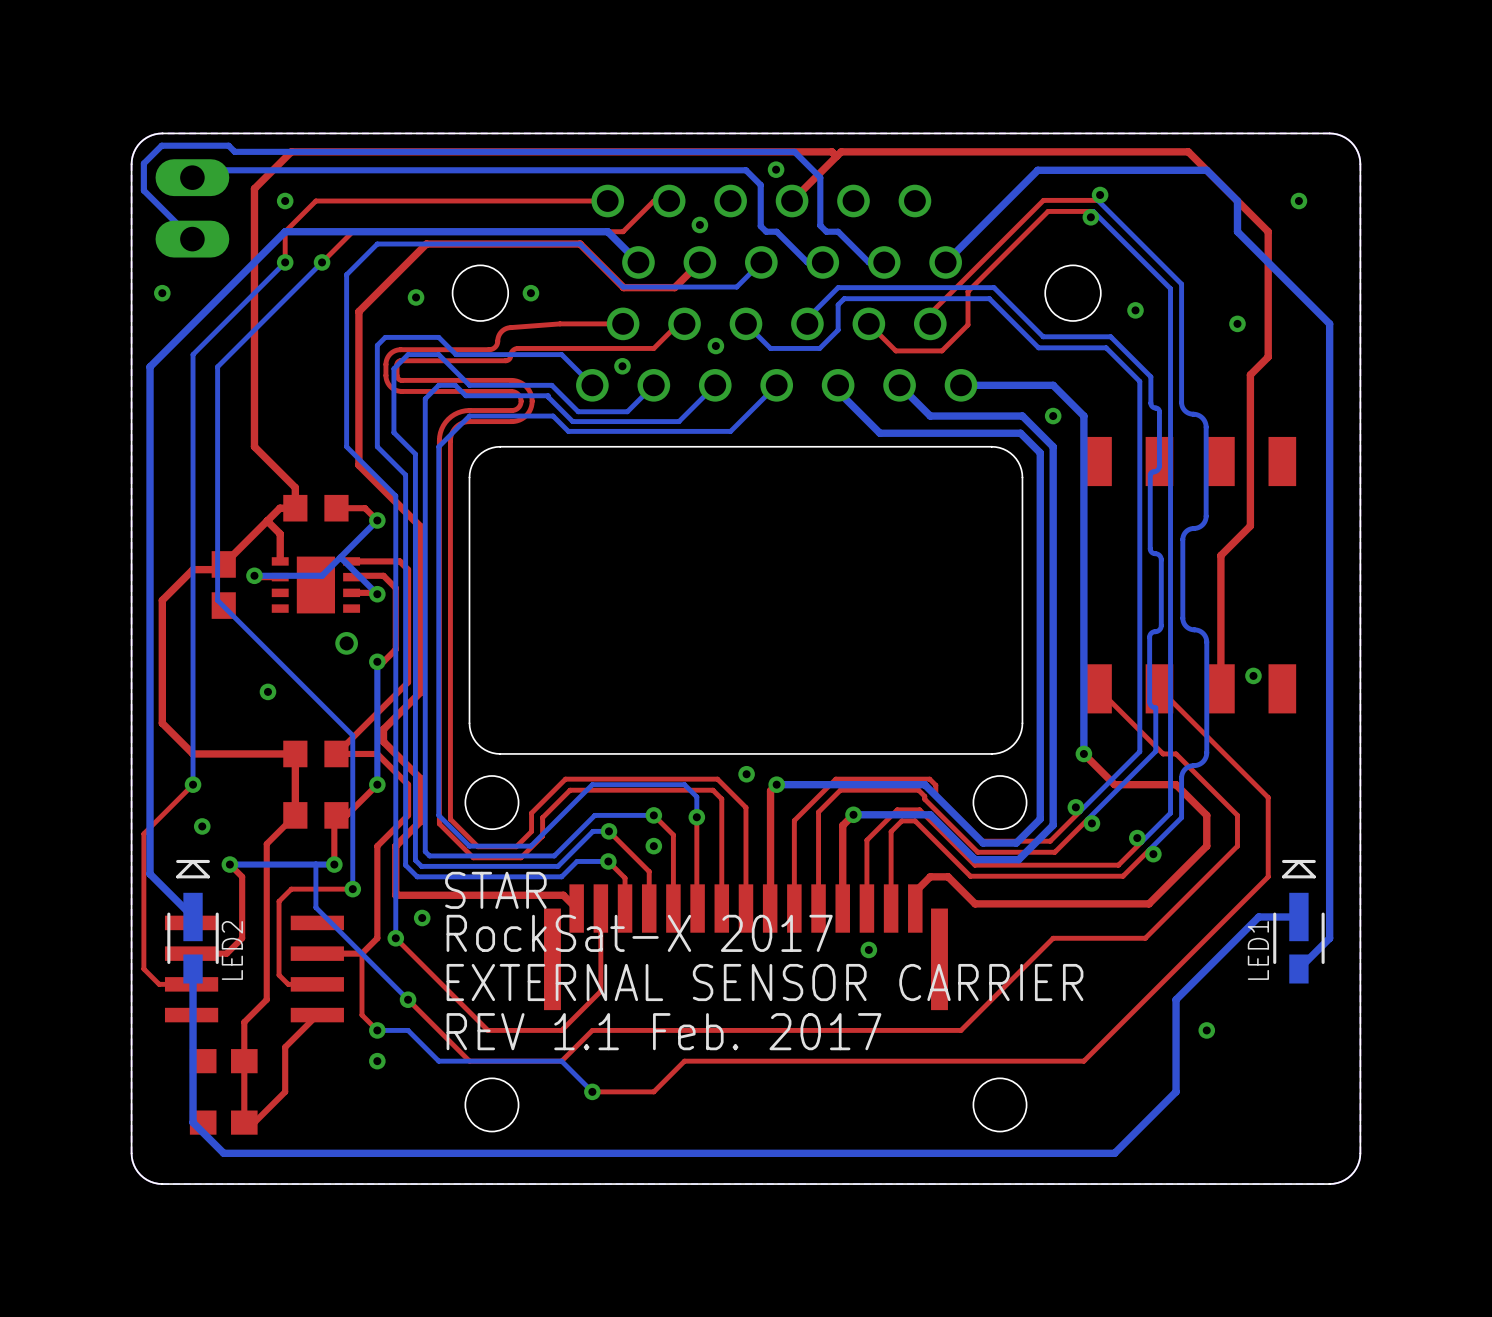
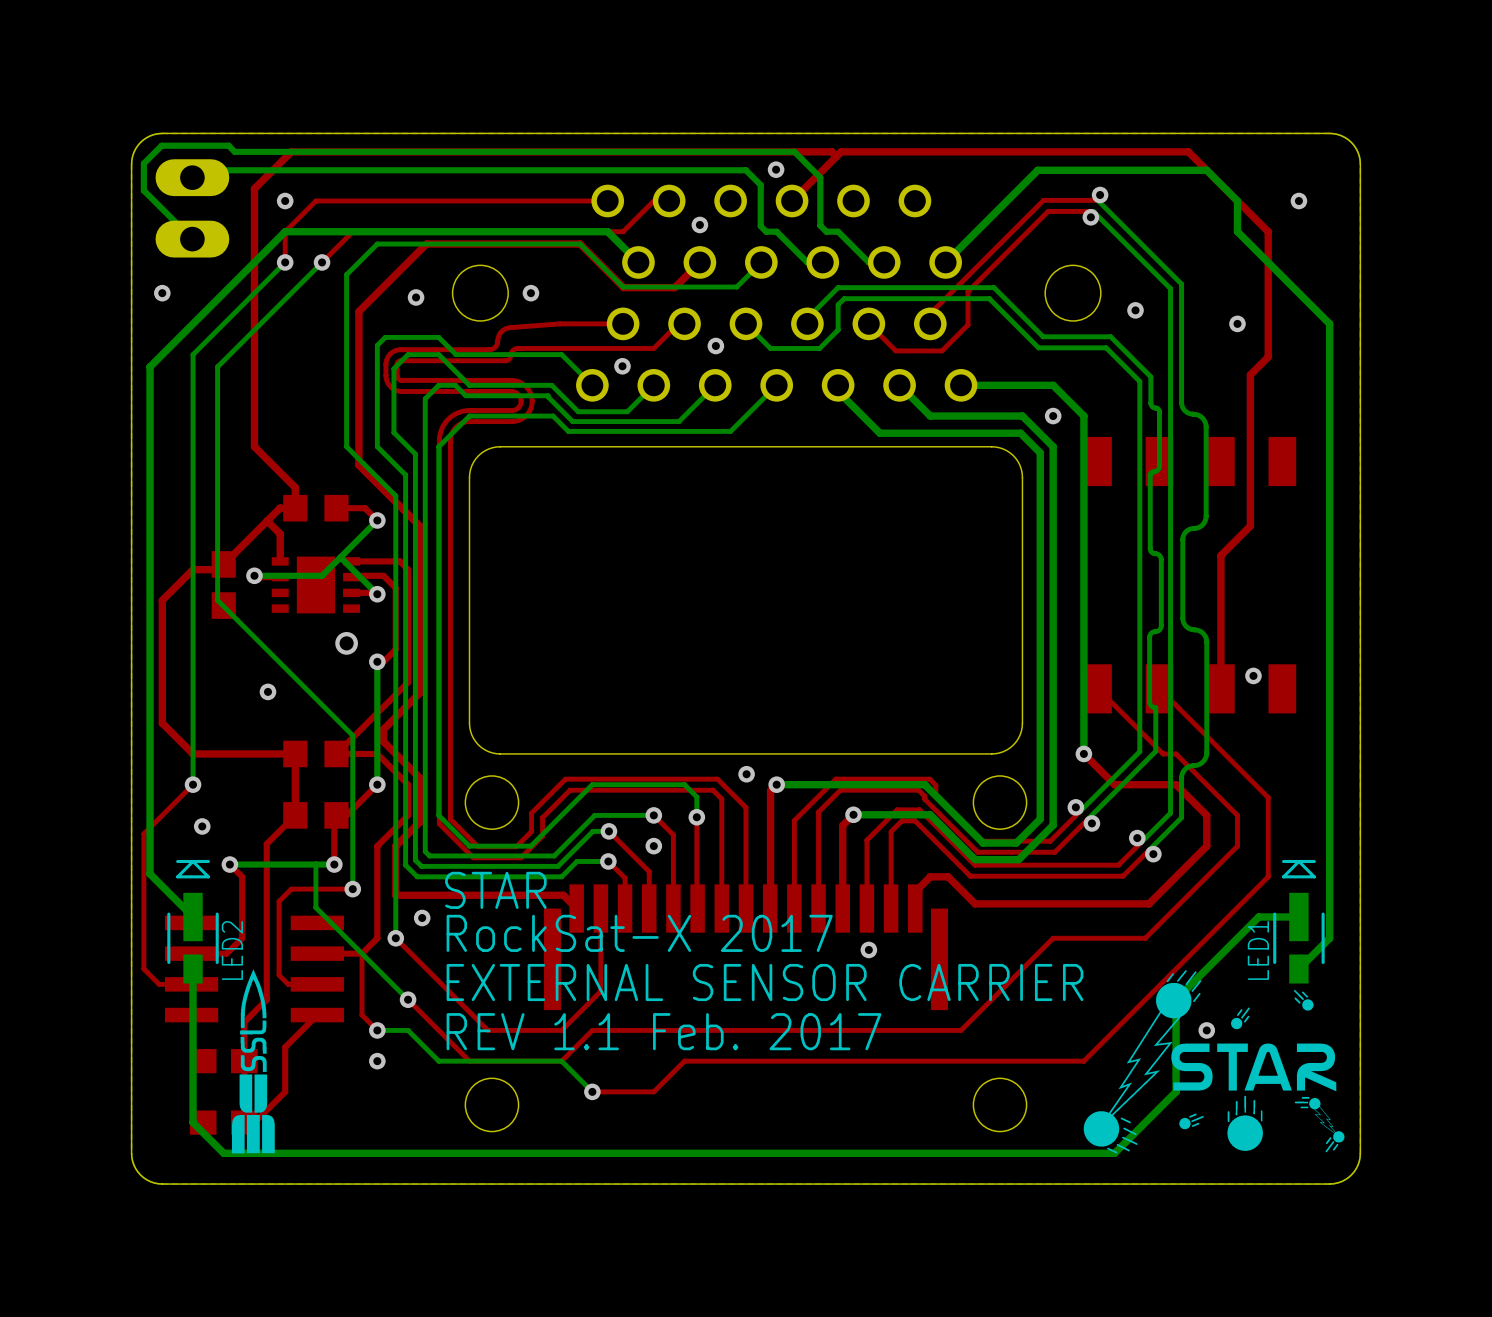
drawing: none -> [231, 969, 275, 1154]
drawing: none -> [1083, 970, 1345, 1154]

